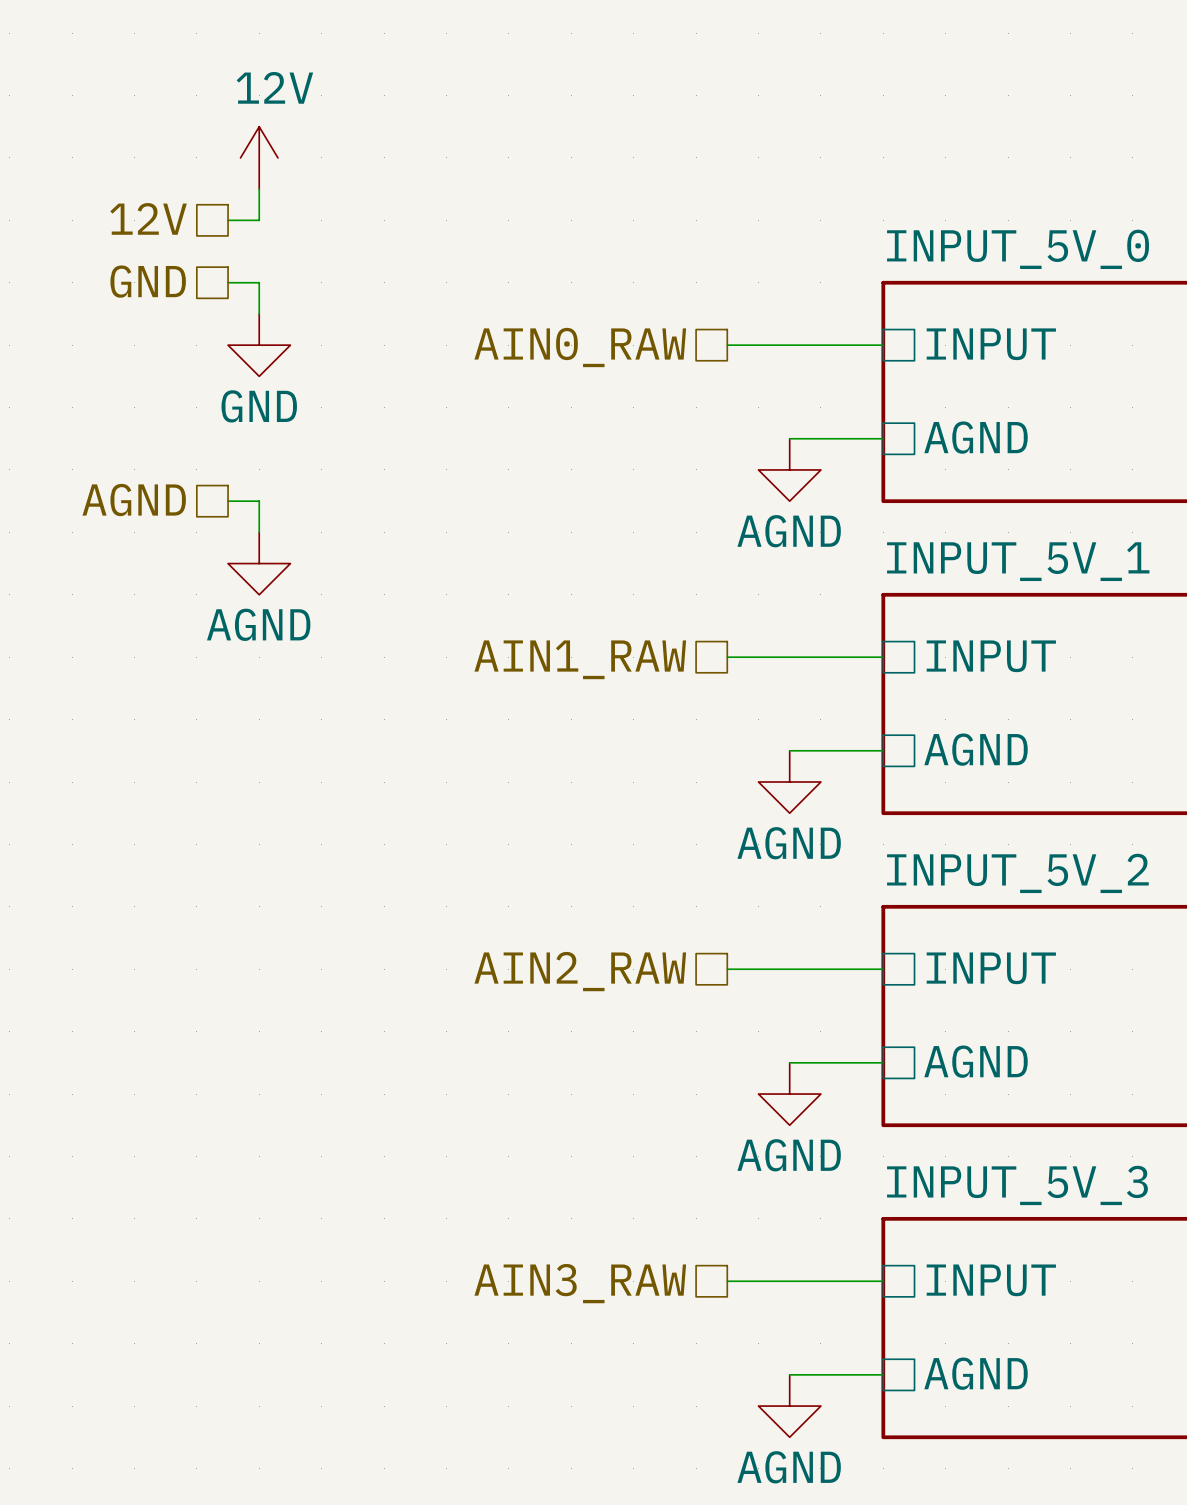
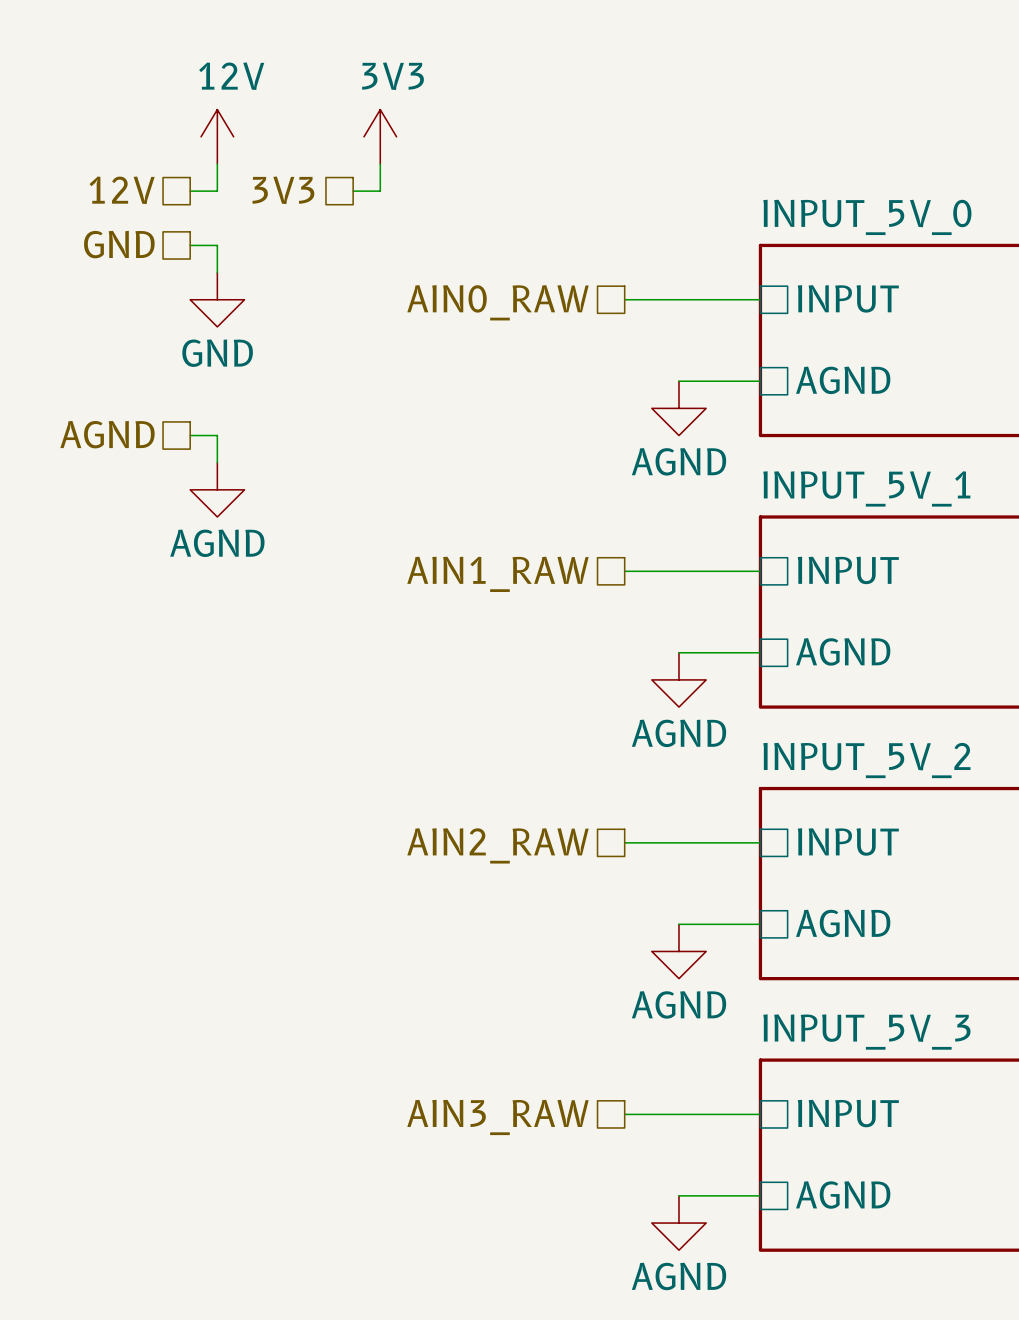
power symbol: none -> 3V3 (380, 136)
wire: none -> (380, 163) (380, 191) (353, 191)
hierarchical label: none -> 3V3 (283, 190)

